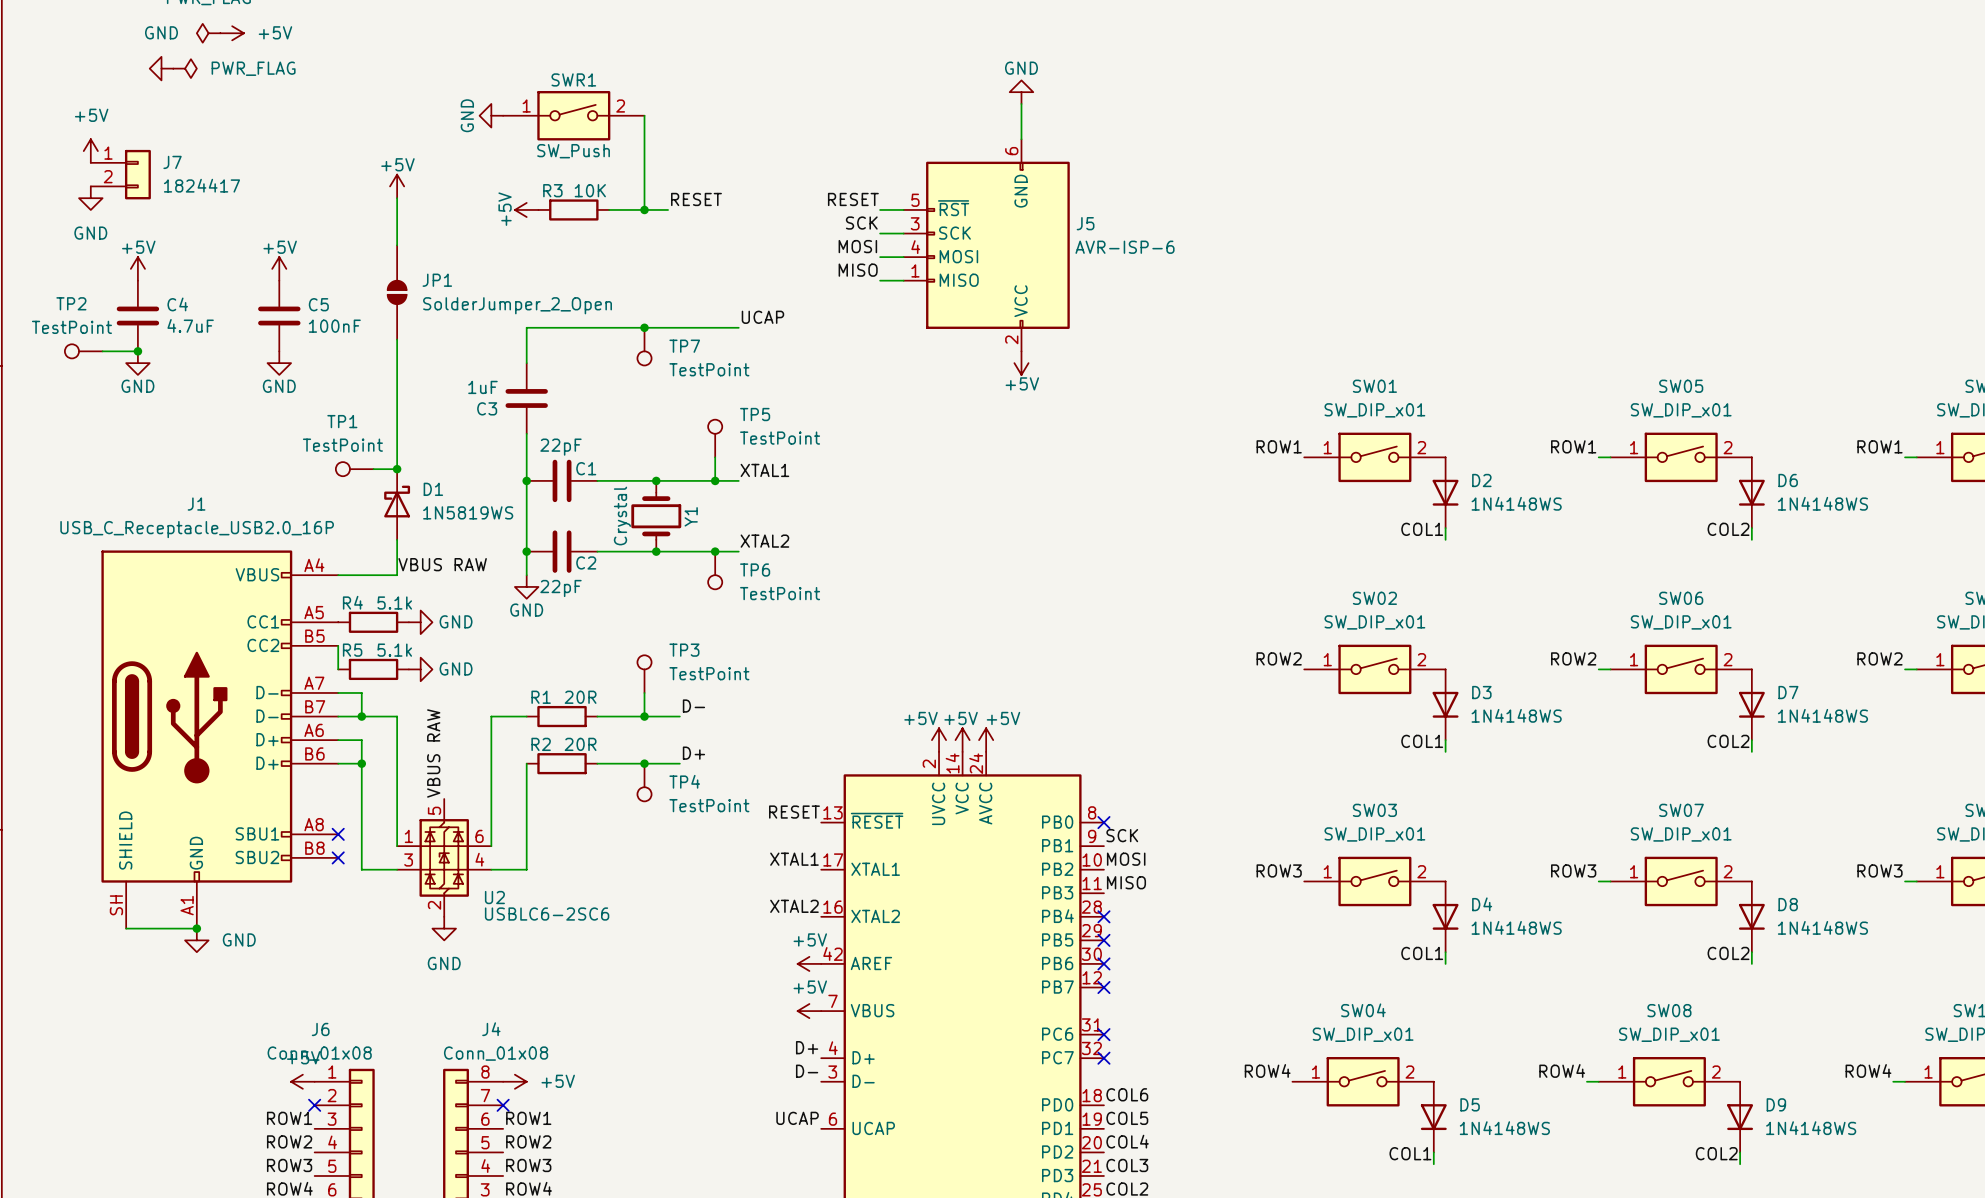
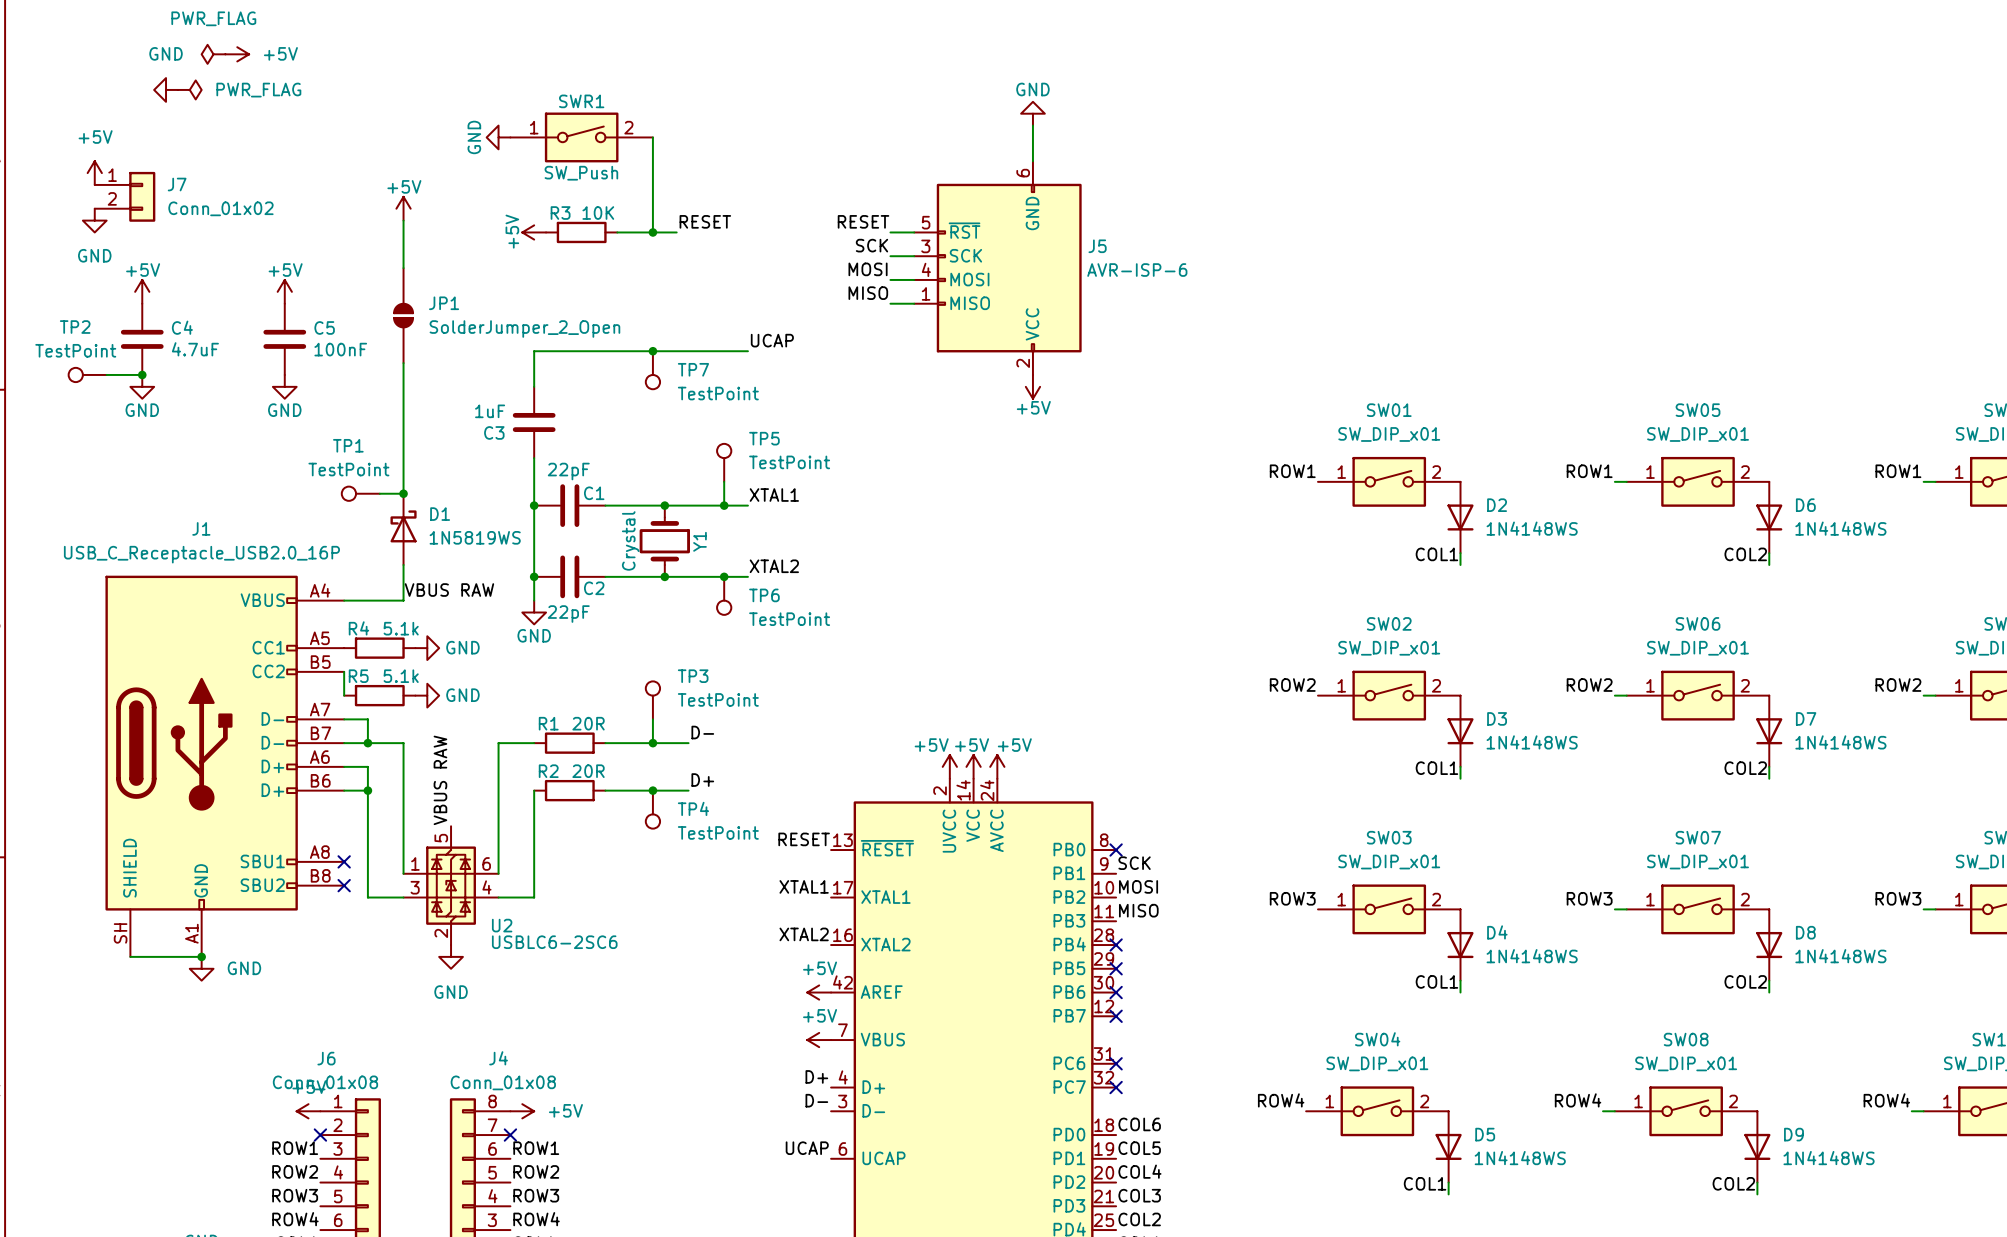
J7 value: 1824417 (201, 185) -> Conn_01x02 (220, 208)

